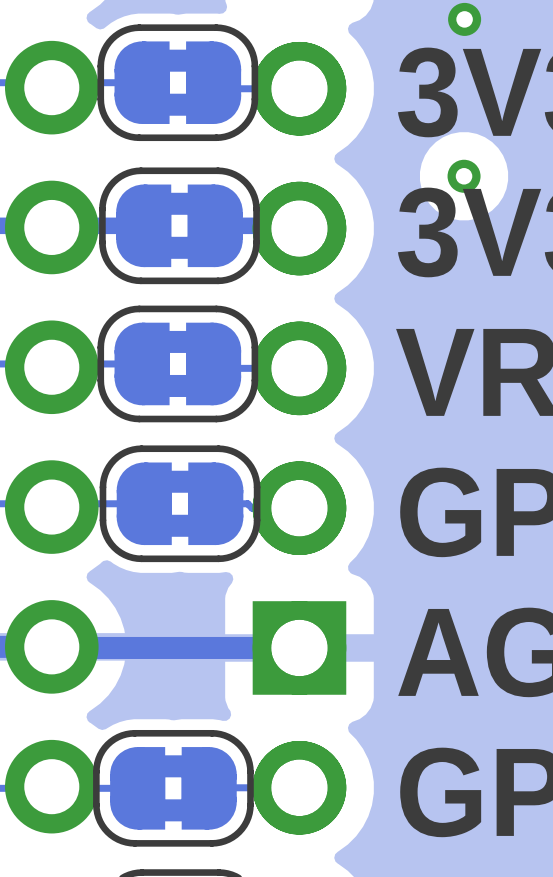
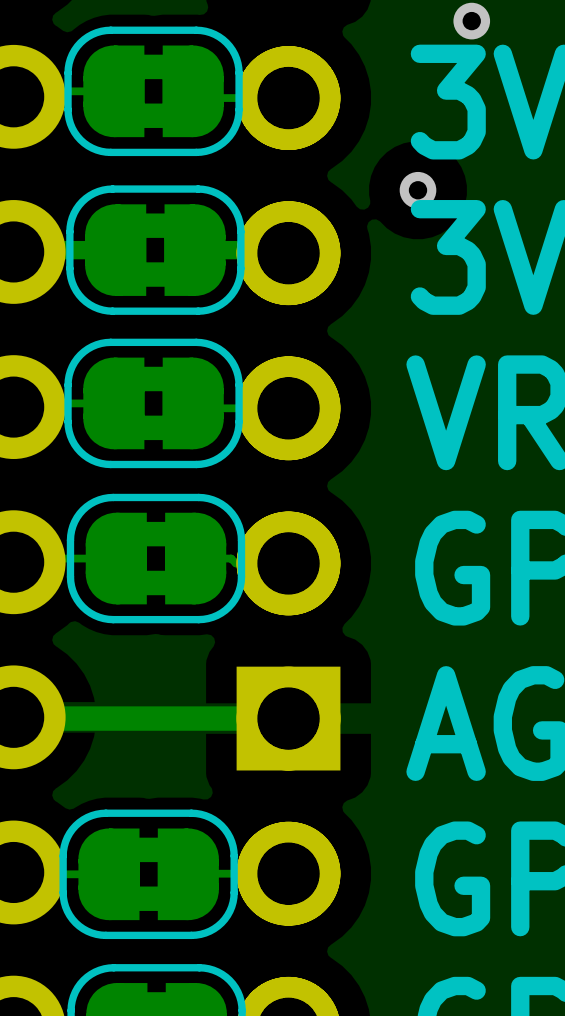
via position: (464, 176) -> (418, 190)

